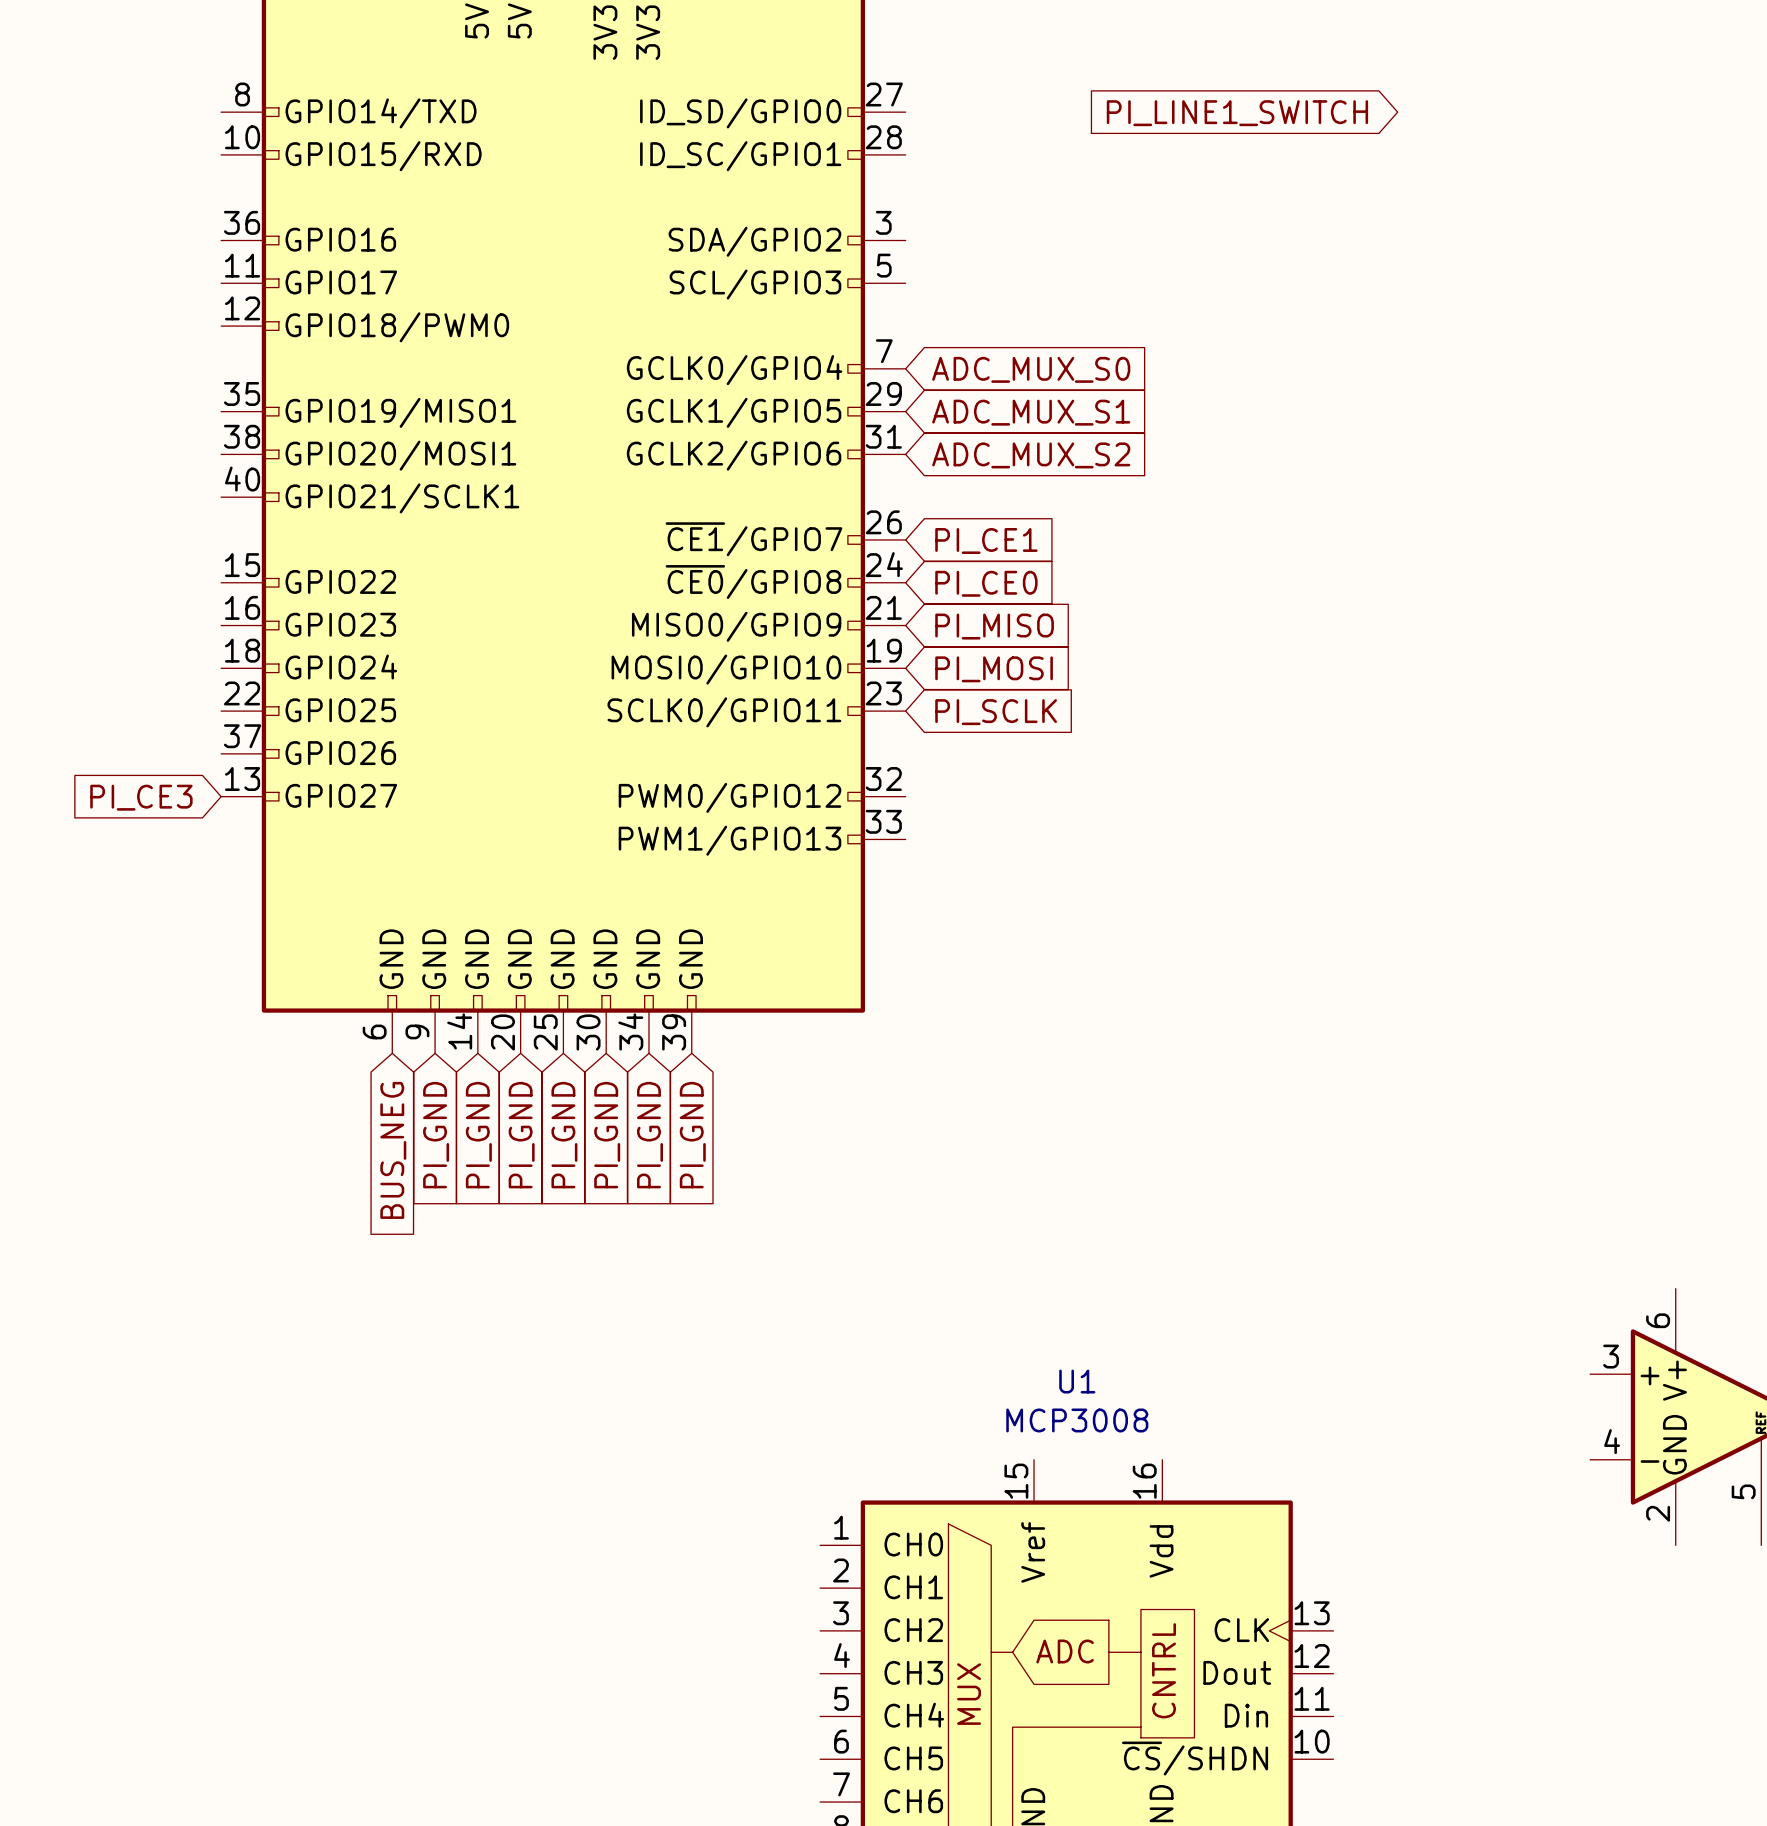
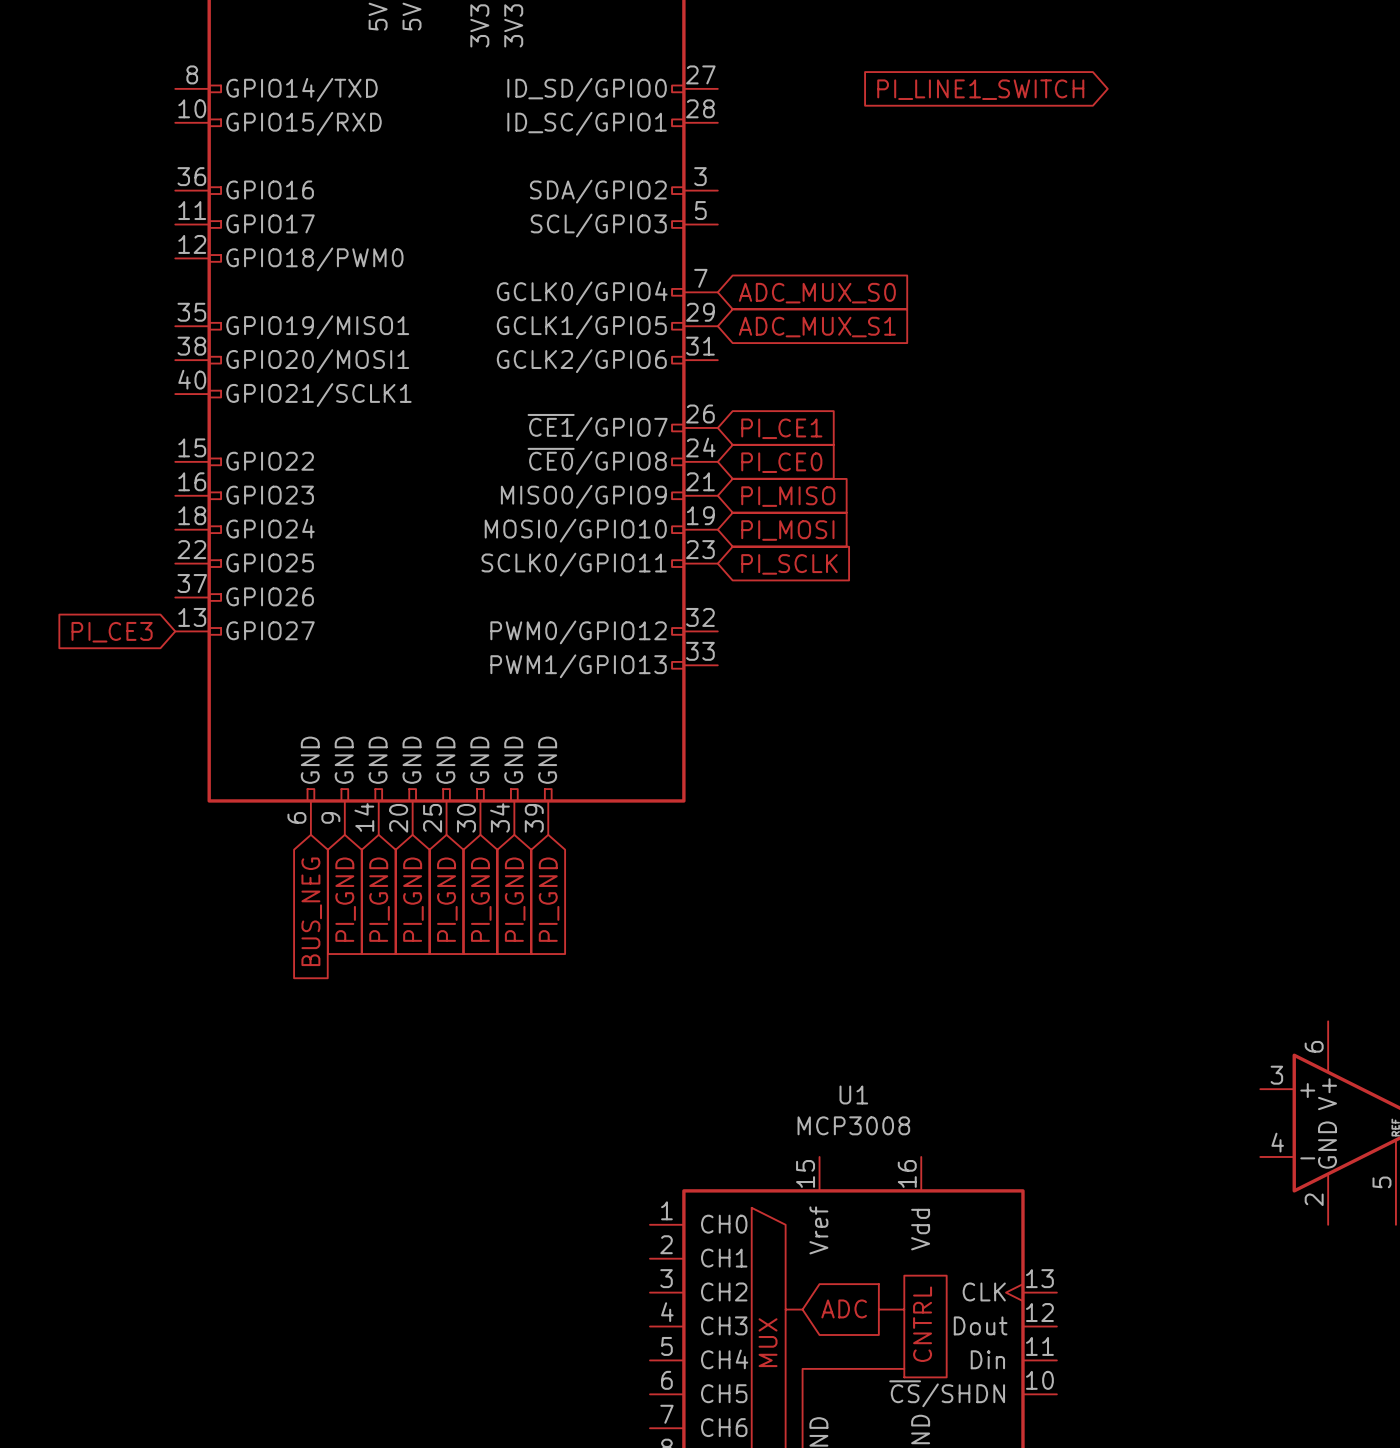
global label: ADC_MUX_S2 (1031, 455) -> none

